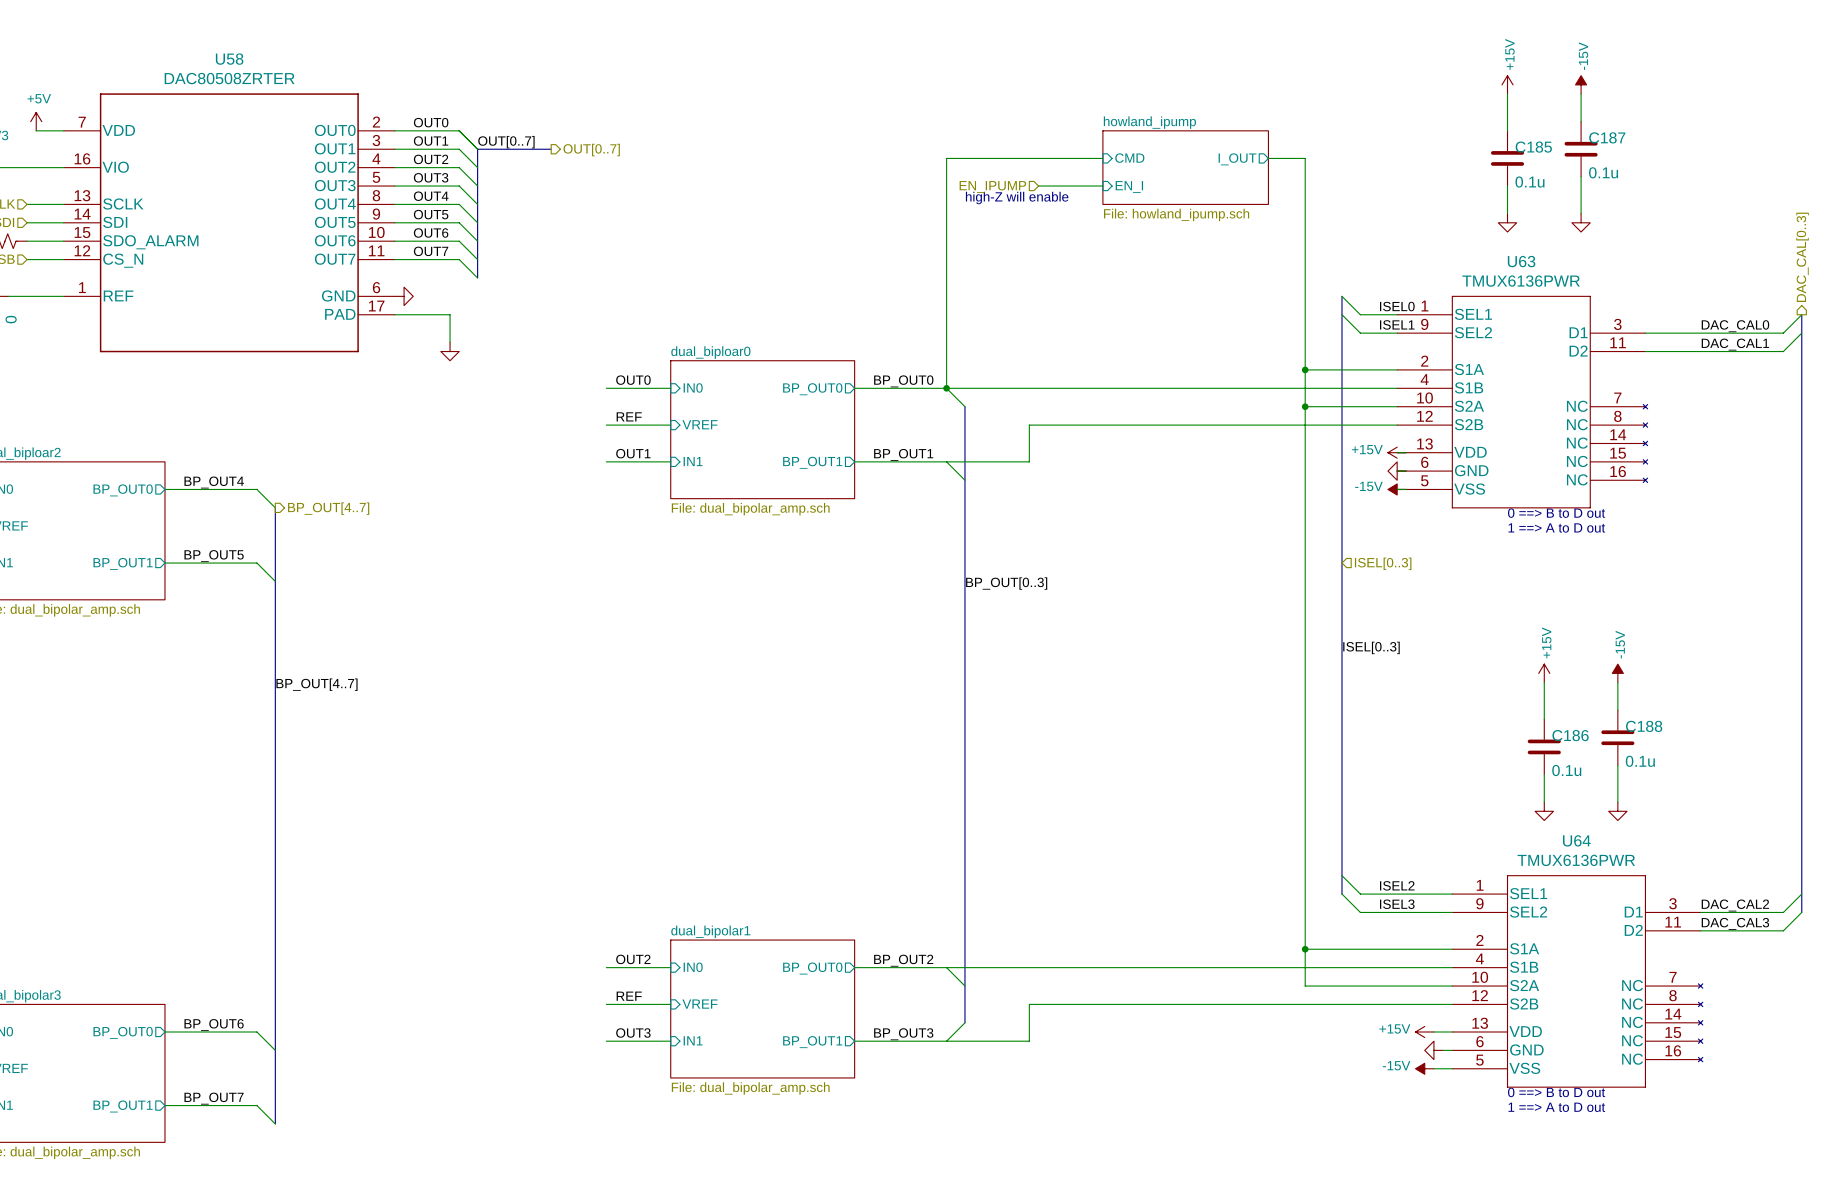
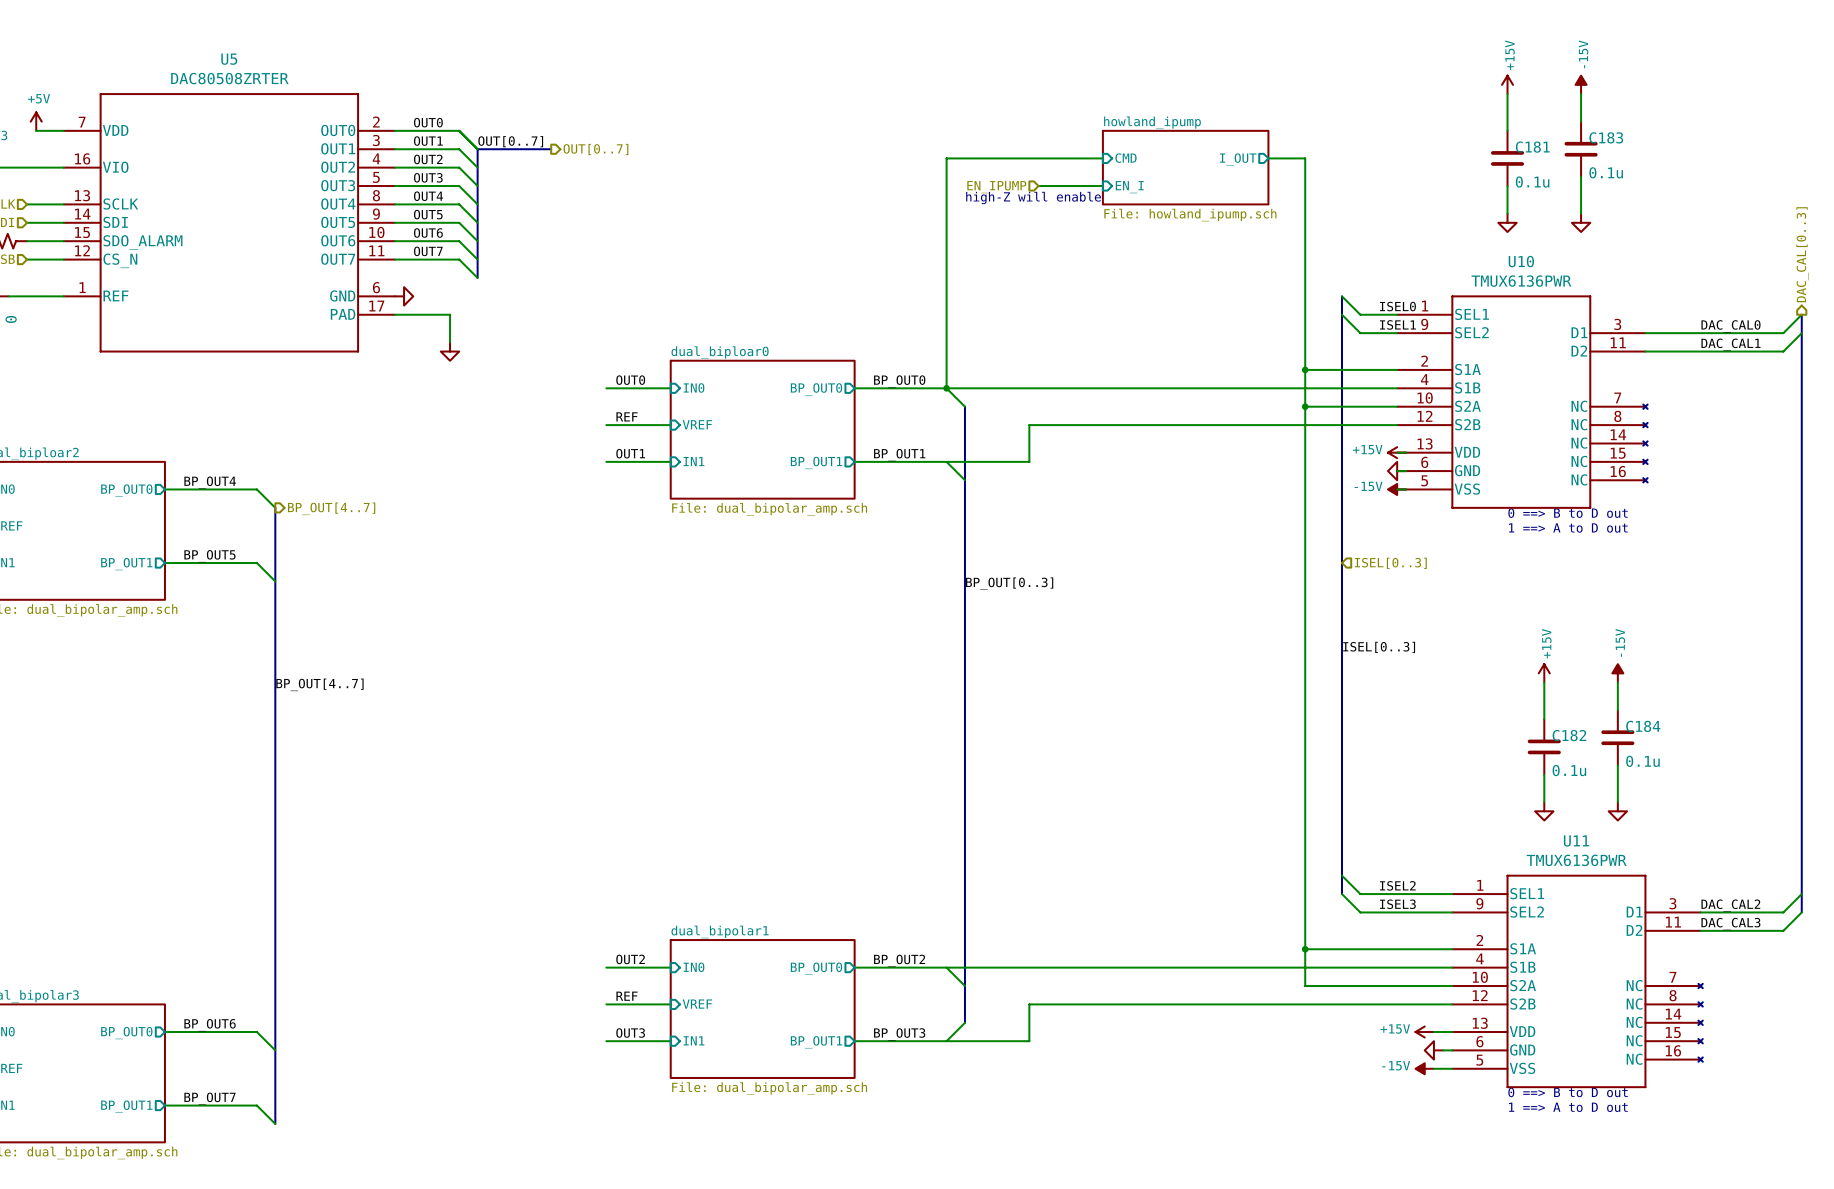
U58 name: U58 (229, 59) -> U5 (229, 59)
C187 name: C187 (1607, 137) -> C183 (1606, 137)
C185 name: C185 (1533, 147) -> C181 (1532, 147)
U63 name: U63 (1521, 261) -> U10 (1521, 261)
C188 name: C188 (1644, 726) -> C184 (1643, 726)
C186 name: C186 (1570, 735) -> C182 (1569, 735)
U64 name: U64 (1576, 840) -> U11 (1576, 840)

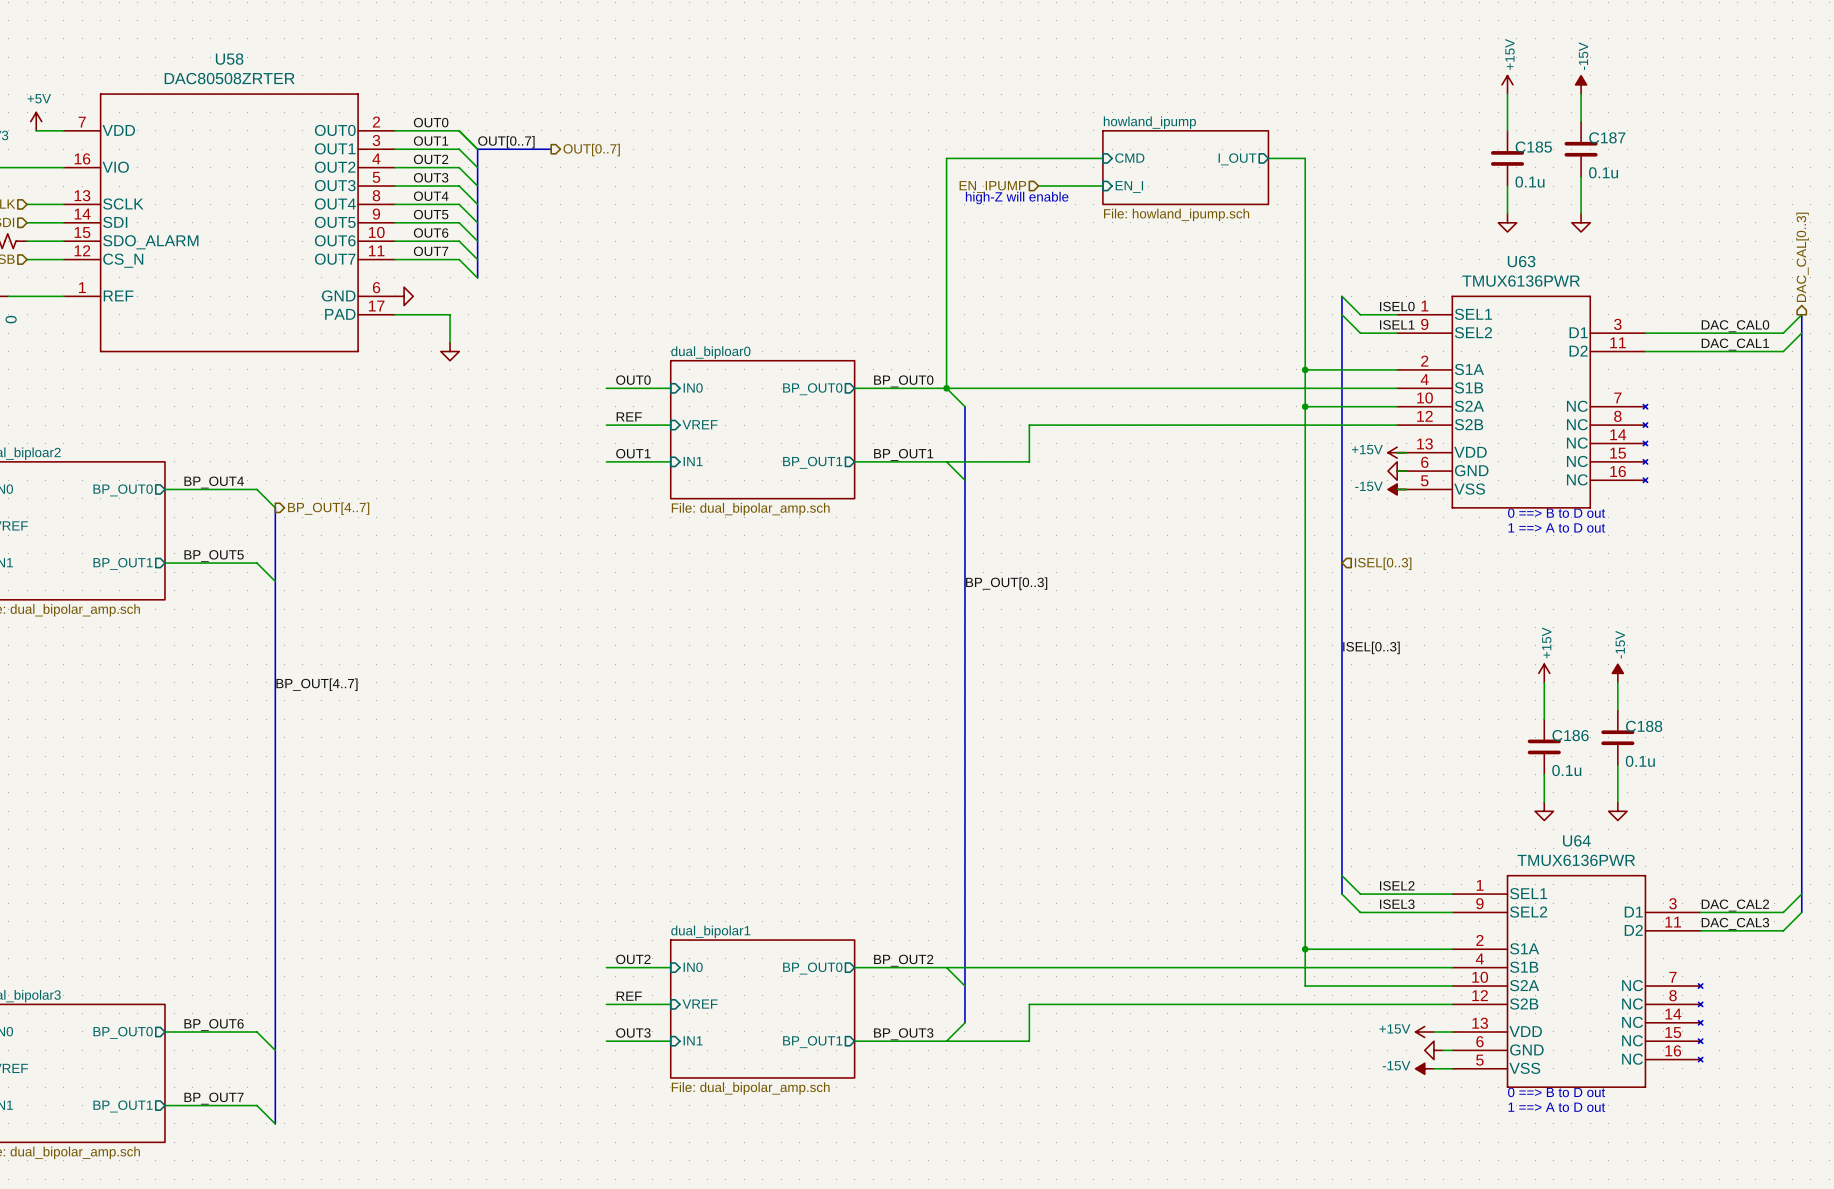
U5 name: U5 (229, 59) -> U58 (229, 59)
C183 name: C183 (1606, 137) -> C187 (1607, 137)
C181 name: C181 (1532, 147) -> C185 (1533, 147)
U10 name: U10 (1521, 261) -> U63 (1521, 261)
C184 name: C184 (1643, 726) -> C188 (1644, 726)
C182 name: C182 (1569, 735) -> C186 (1570, 735)
U11 name: U11 (1576, 840) -> U64 (1576, 840)

